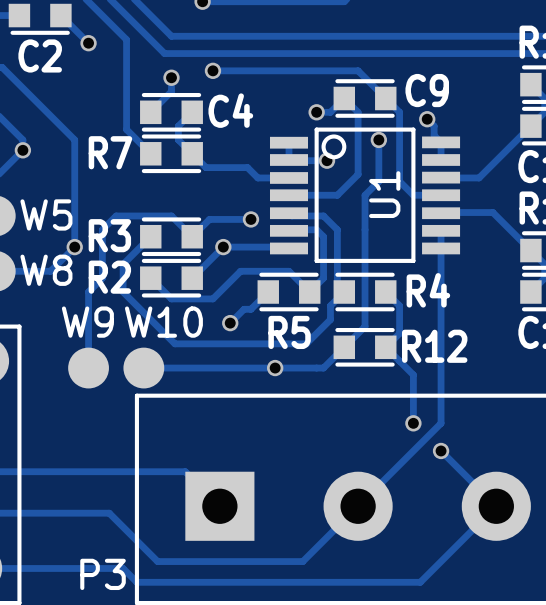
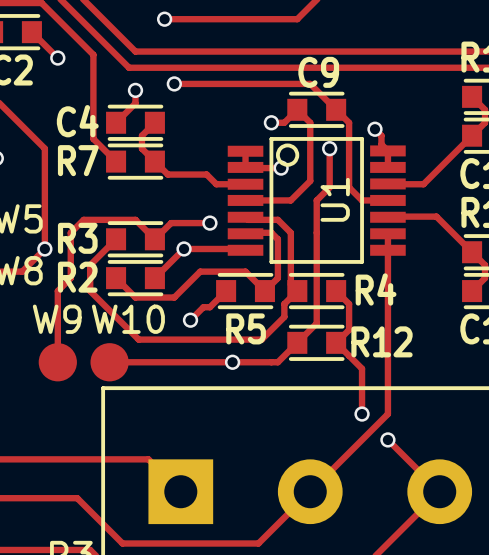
C9 name position: C9 (427, 90) -> C9 (318, 72)
C4 name position: C4 (230, 110) -> C4 (77, 121)

